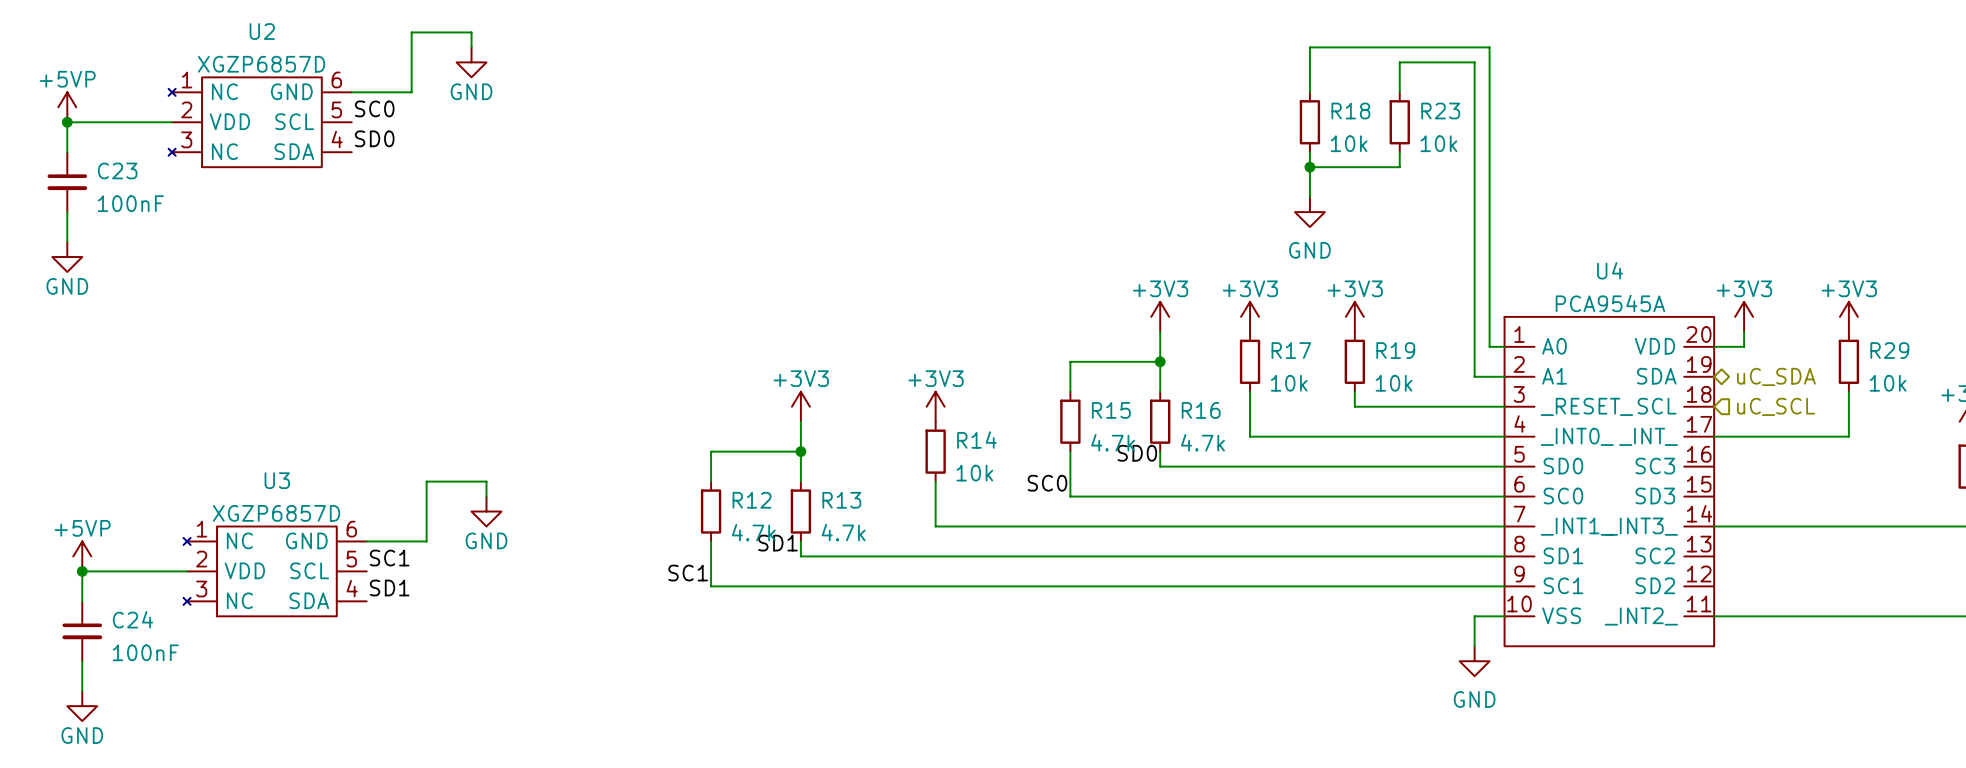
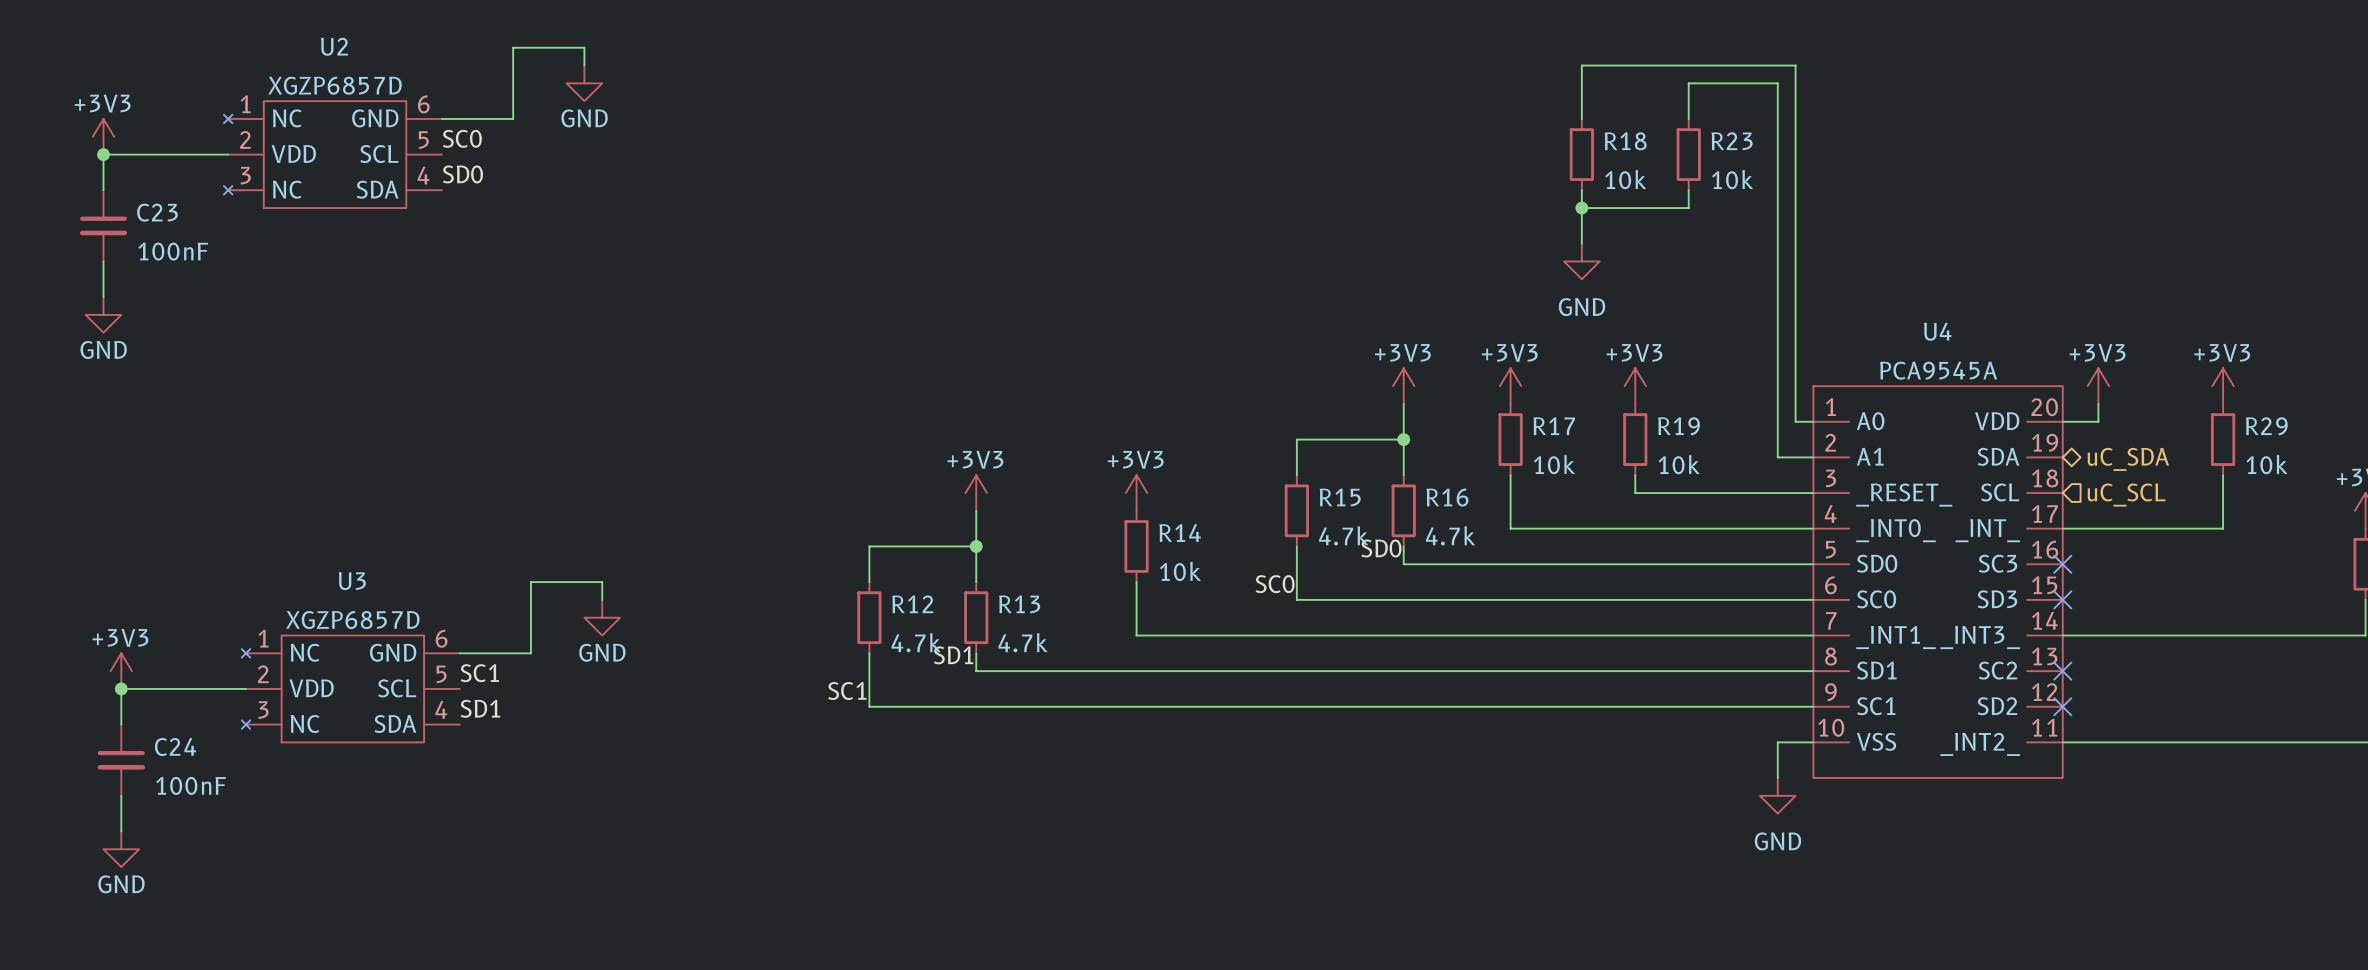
power symbol: +5VP (67, 107) -> +3V3 (103, 136)
no-connect mark: none -> (2062, 564)
no-connect mark: none -> (2062, 599)
power symbol: +5VP (82, 556) -> +3V3 (121, 671)
no-connect mark: none -> (2062, 671)
no-connect mark: none -> (2062, 706)

